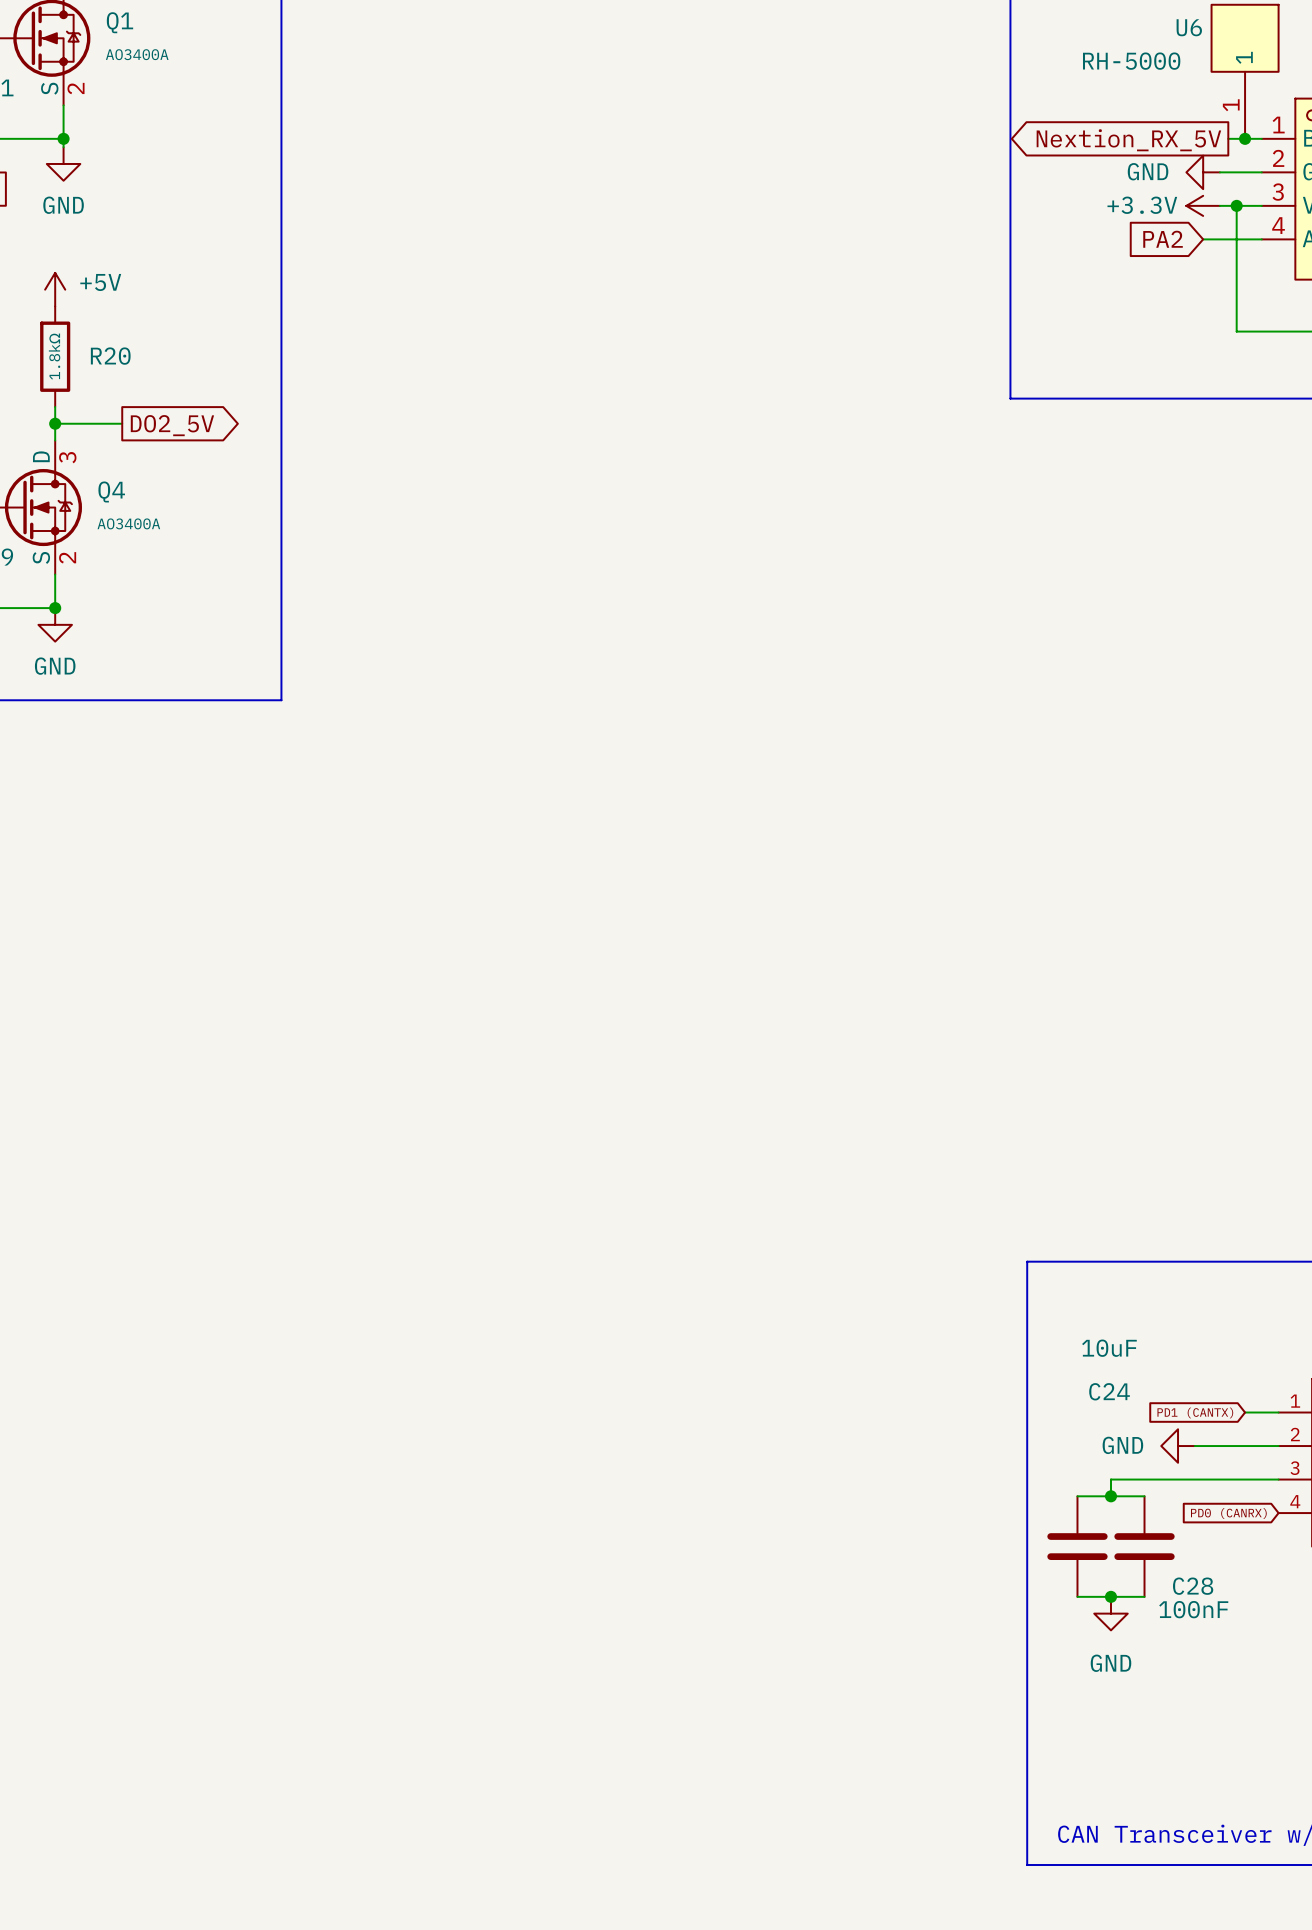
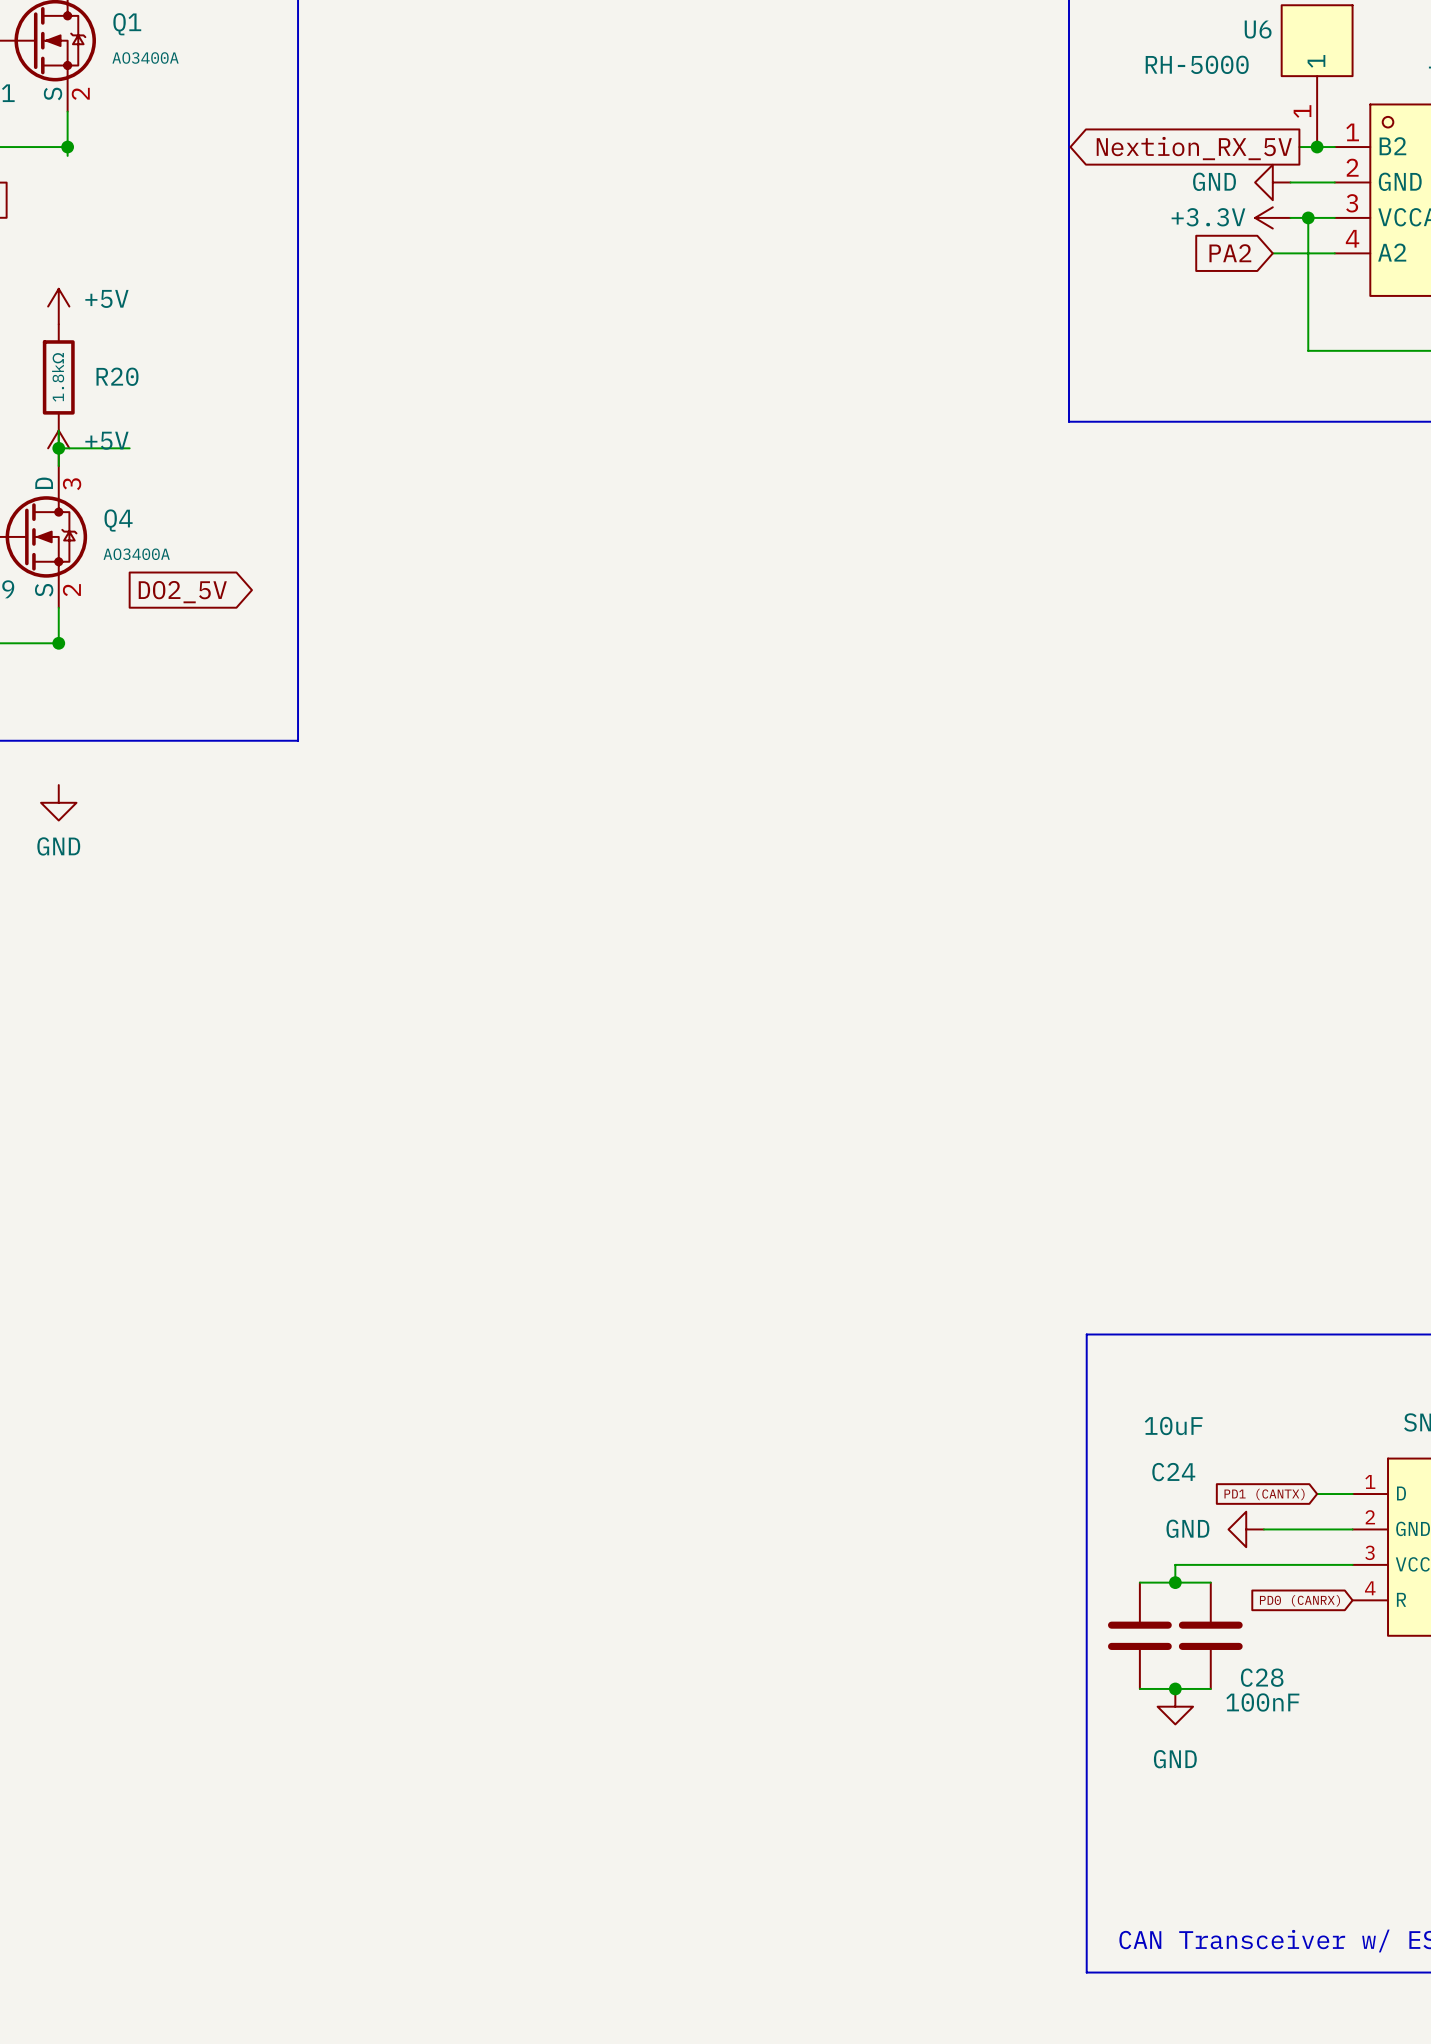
power symbol: GND (63, 163) -> none
power symbol: none -> +5V (58, 448)
global label position: DO2_5V (172, 425) -> DO2_5V (182, 592)
power symbol position: GND (55, 624) -> GND (58, 802)

